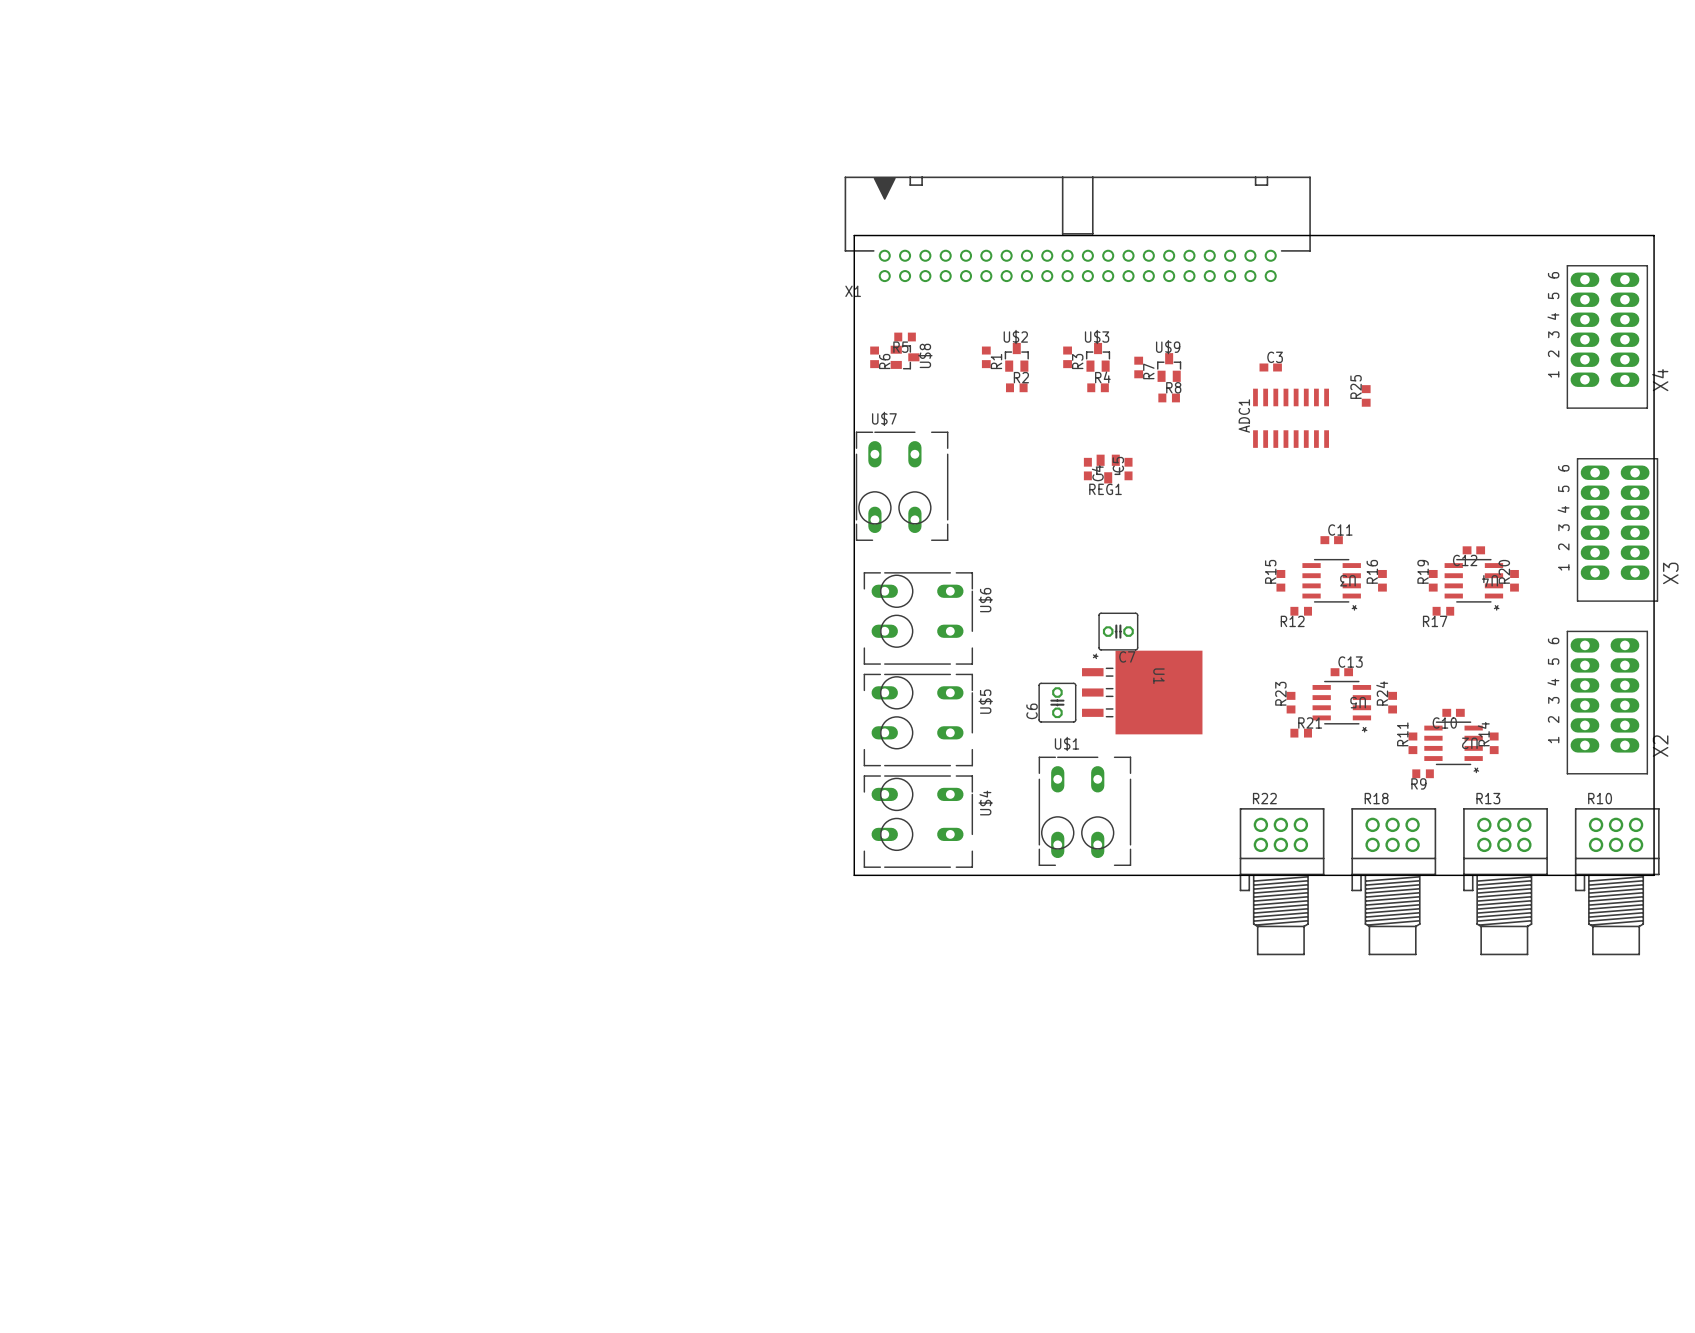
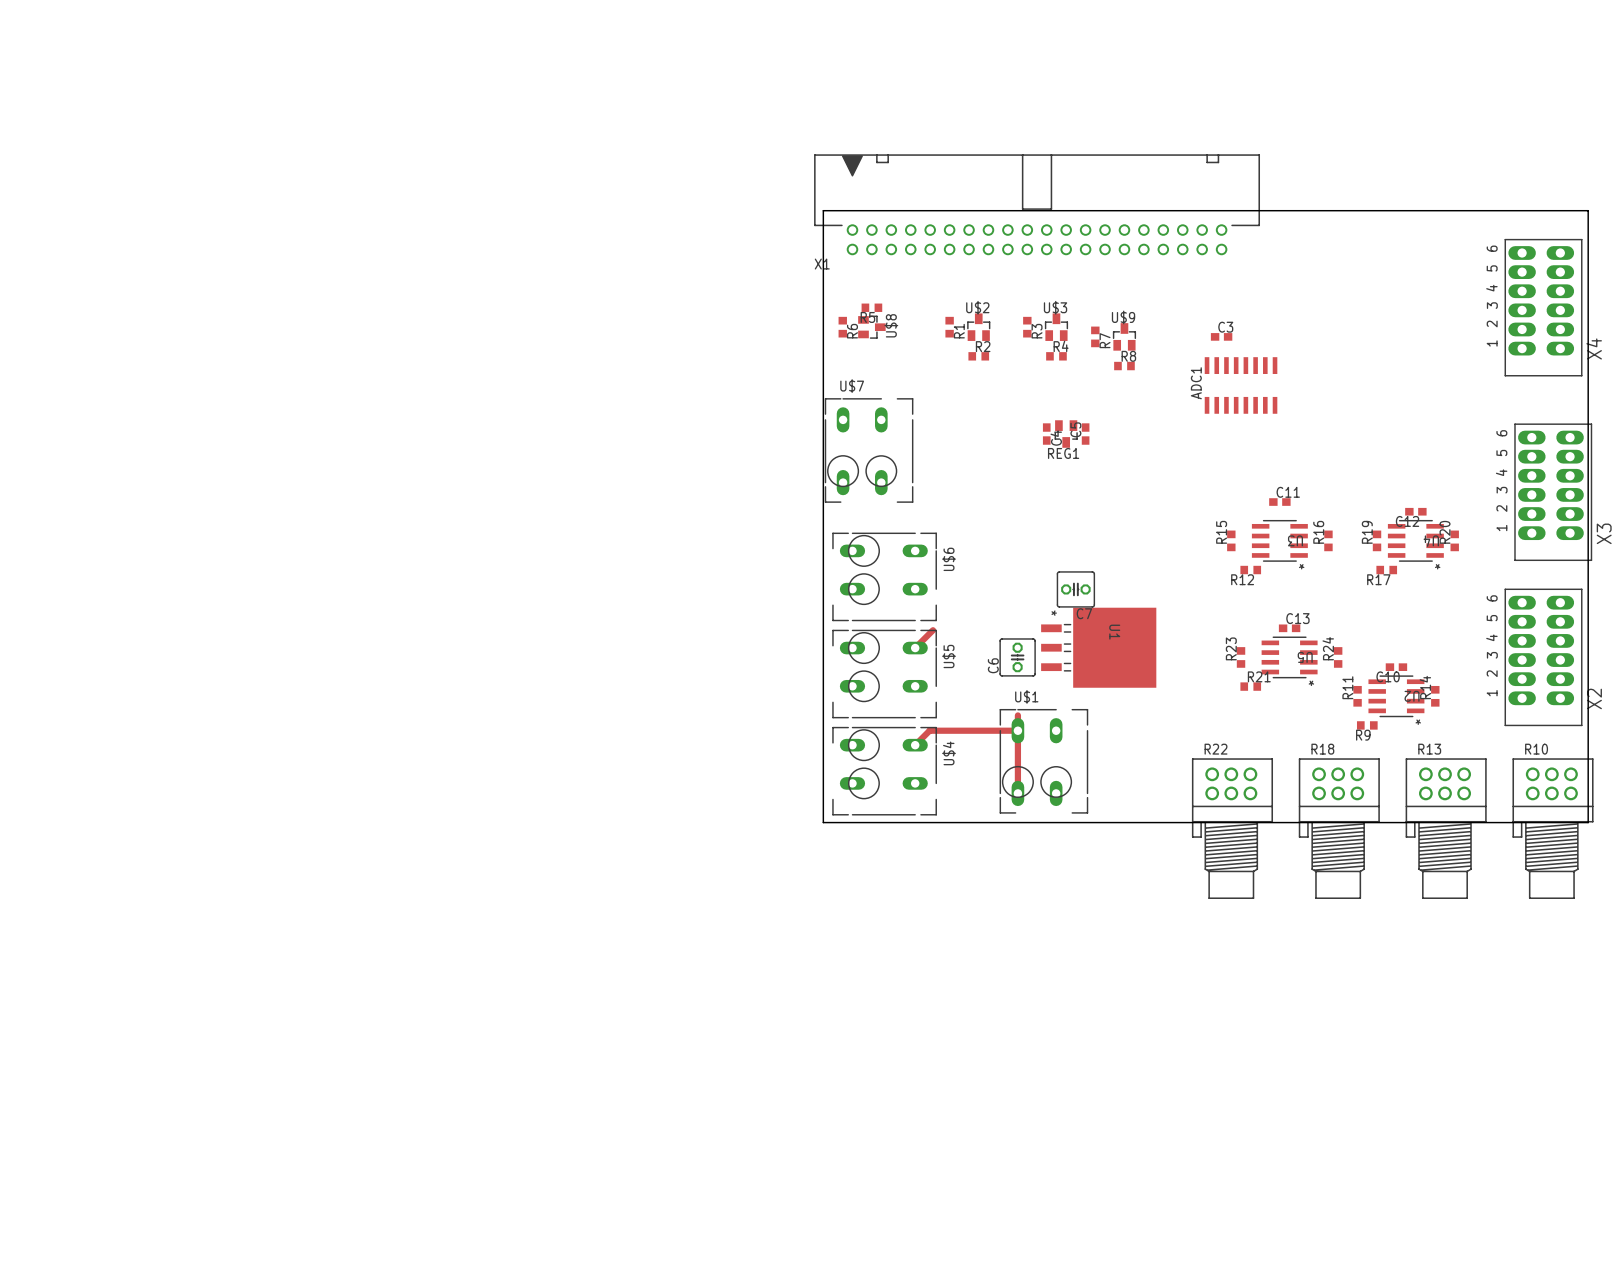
R25: (1366, 395) -> none
track: none -> (932, 630) (915, 648)
track: none -> (1017, 715) (1017, 793)
track: none -> (1017, 730) (929, 730) (915, 745)

